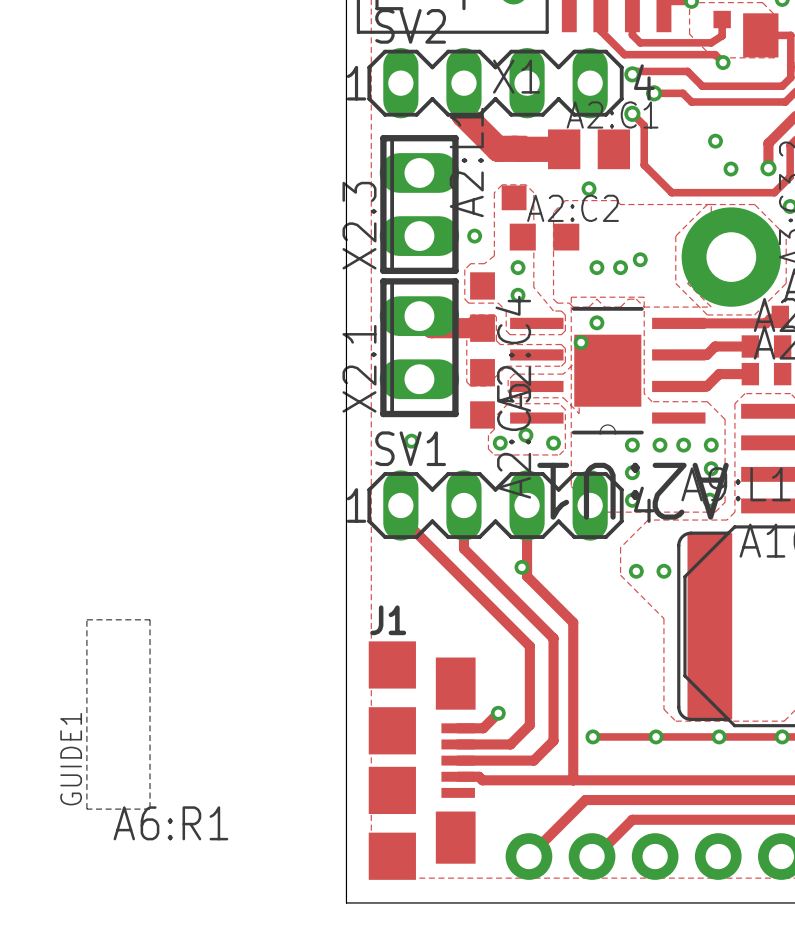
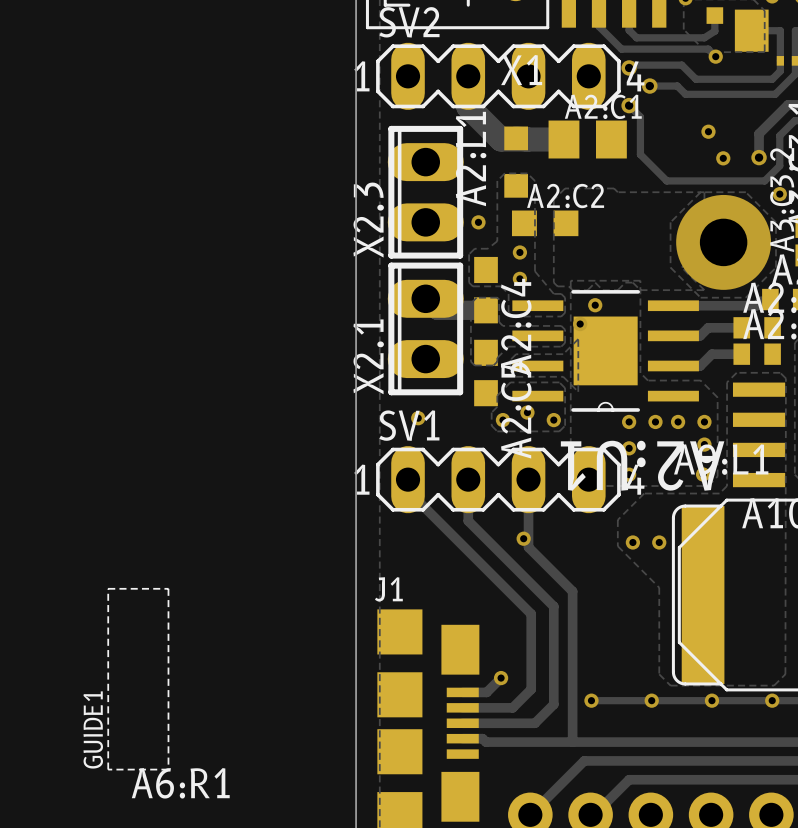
via: (589, 188) -> none
via: (640, 259) -> none
via: (596, 267) -> none
via: (620, 267) -> none

